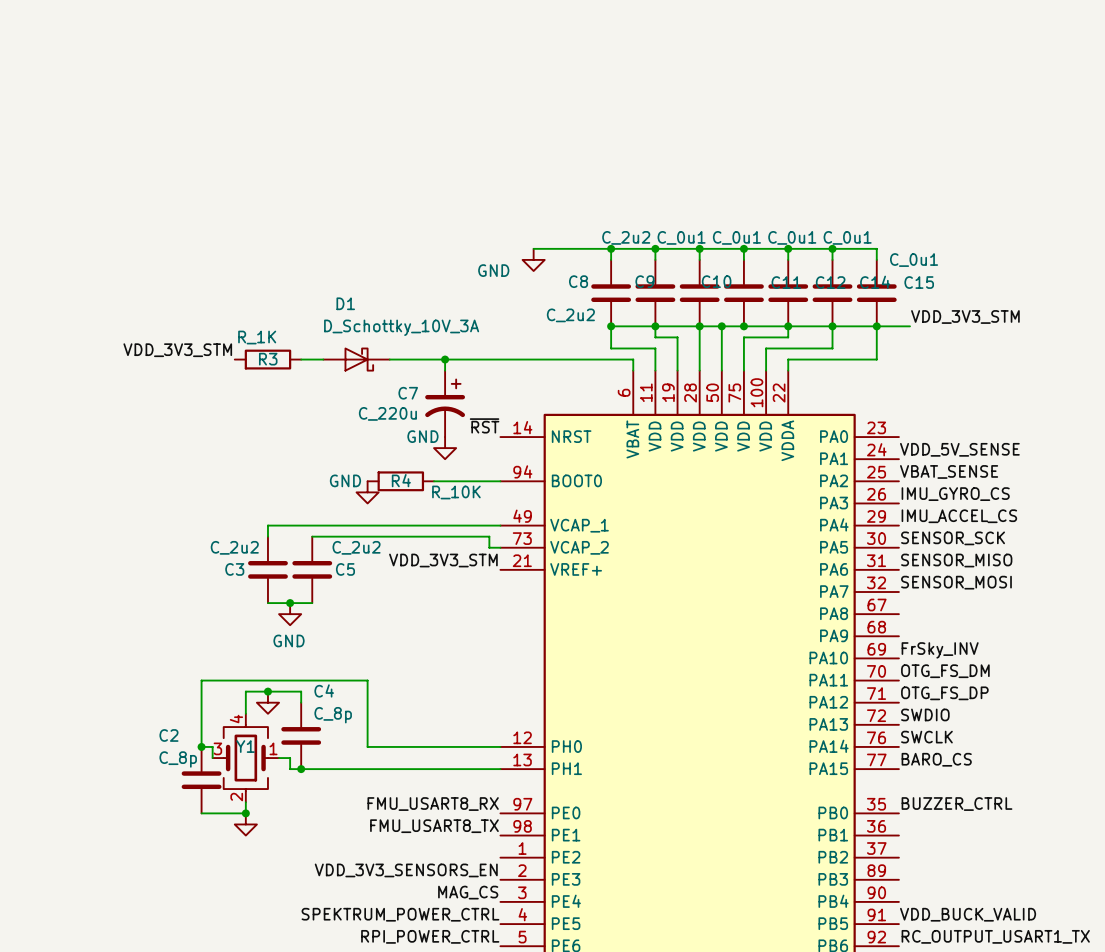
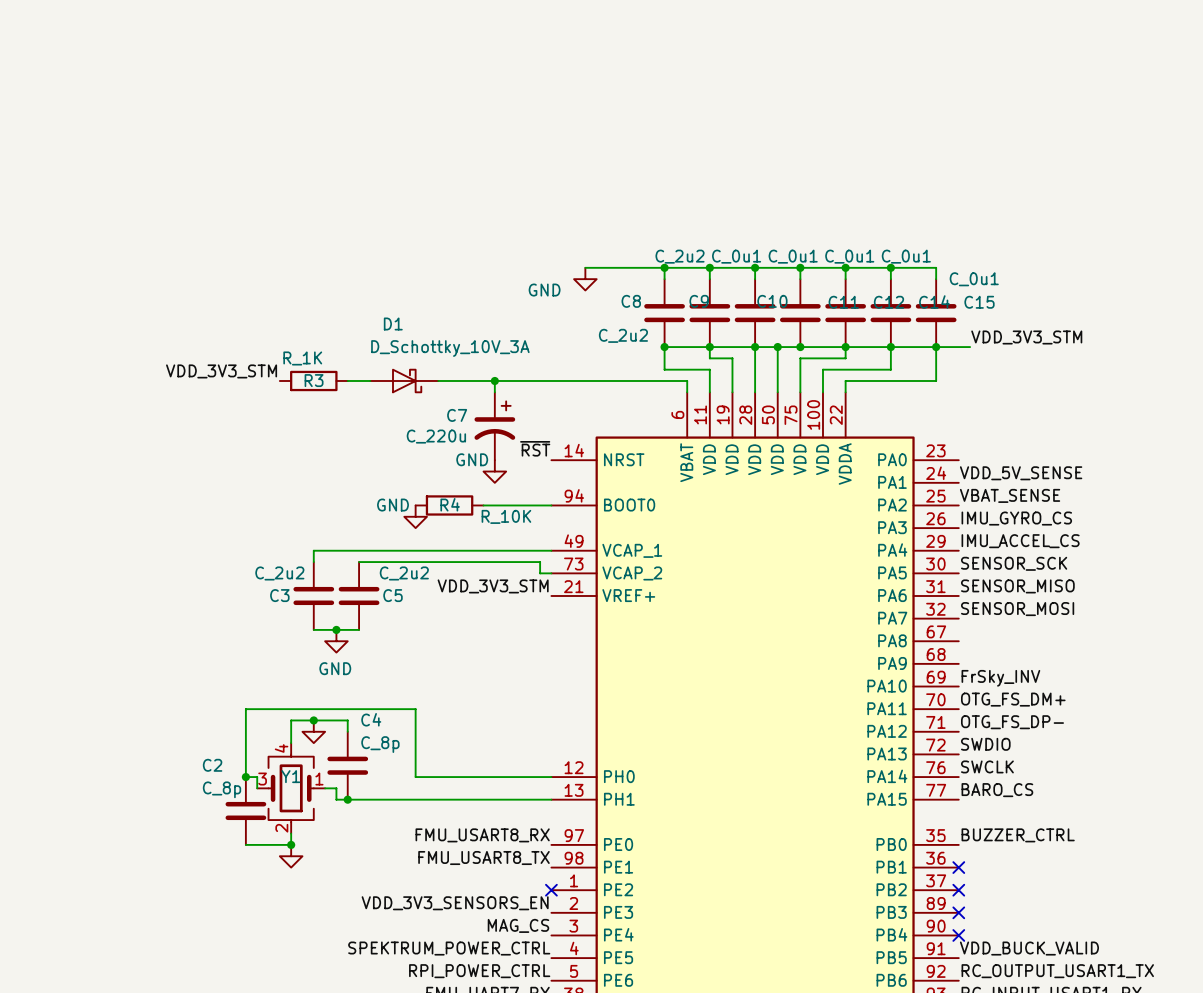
label: OTG_FS_DM (945, 671) -> OTG_FS_DM+ (1013, 699)
label: OTG_FS_DP (944, 693) -> OTG_FS_DP- (1012, 722)
no-connect mark: none -> (958, 867)
no-connect mark: none -> (551, 890)
no-connect mark: none -> (958, 890)
no-connect mark: none -> (958, 912)
no-connect mark: none -> (958, 935)

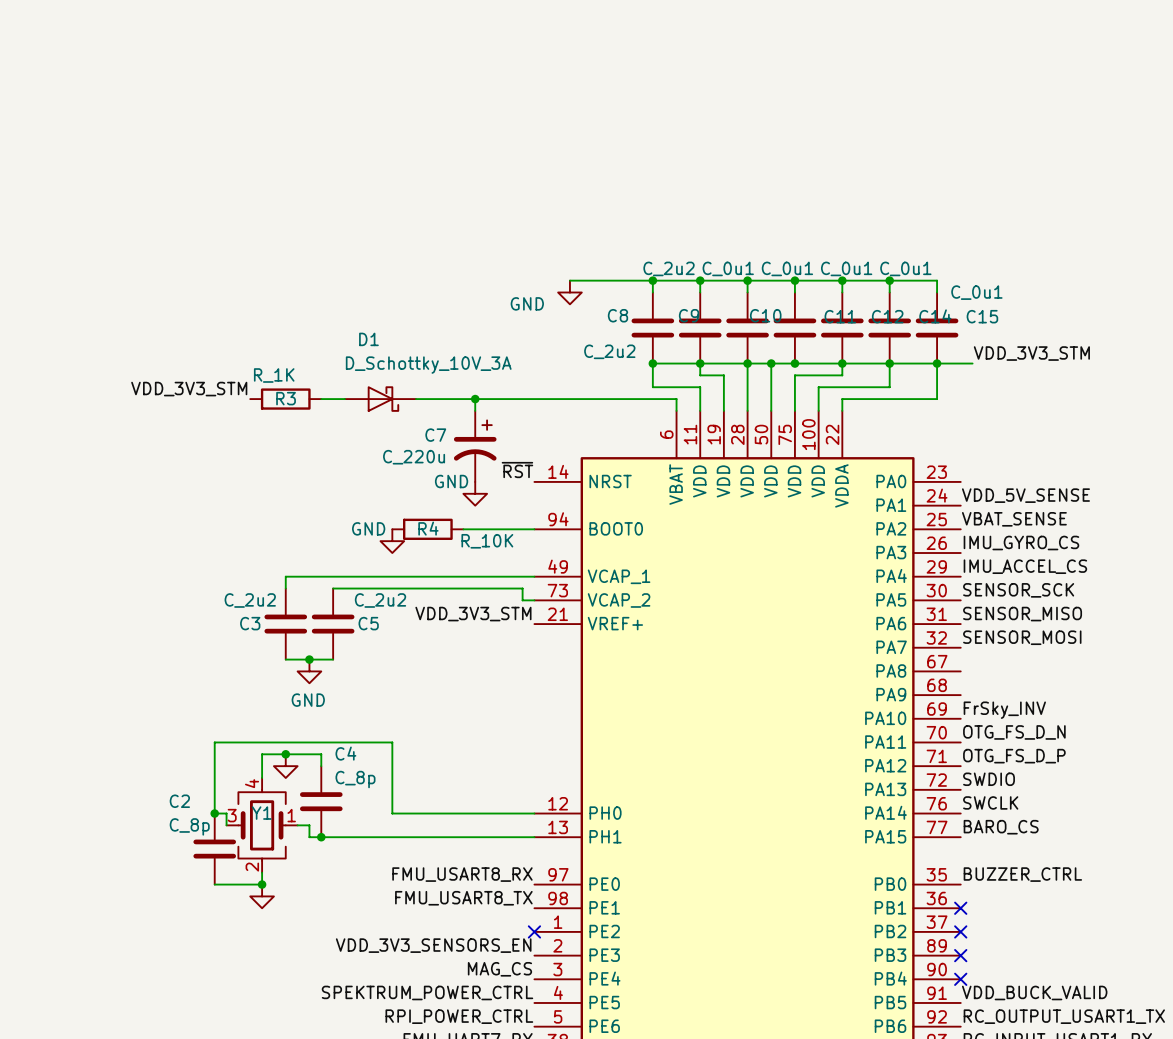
label: OTG_FS_DM+ (1013, 699) -> OTG_FS_D_N (1014, 732)
label: OTG_FS_DP- (1012, 722) -> OTG_FS_D_P (1014, 756)

